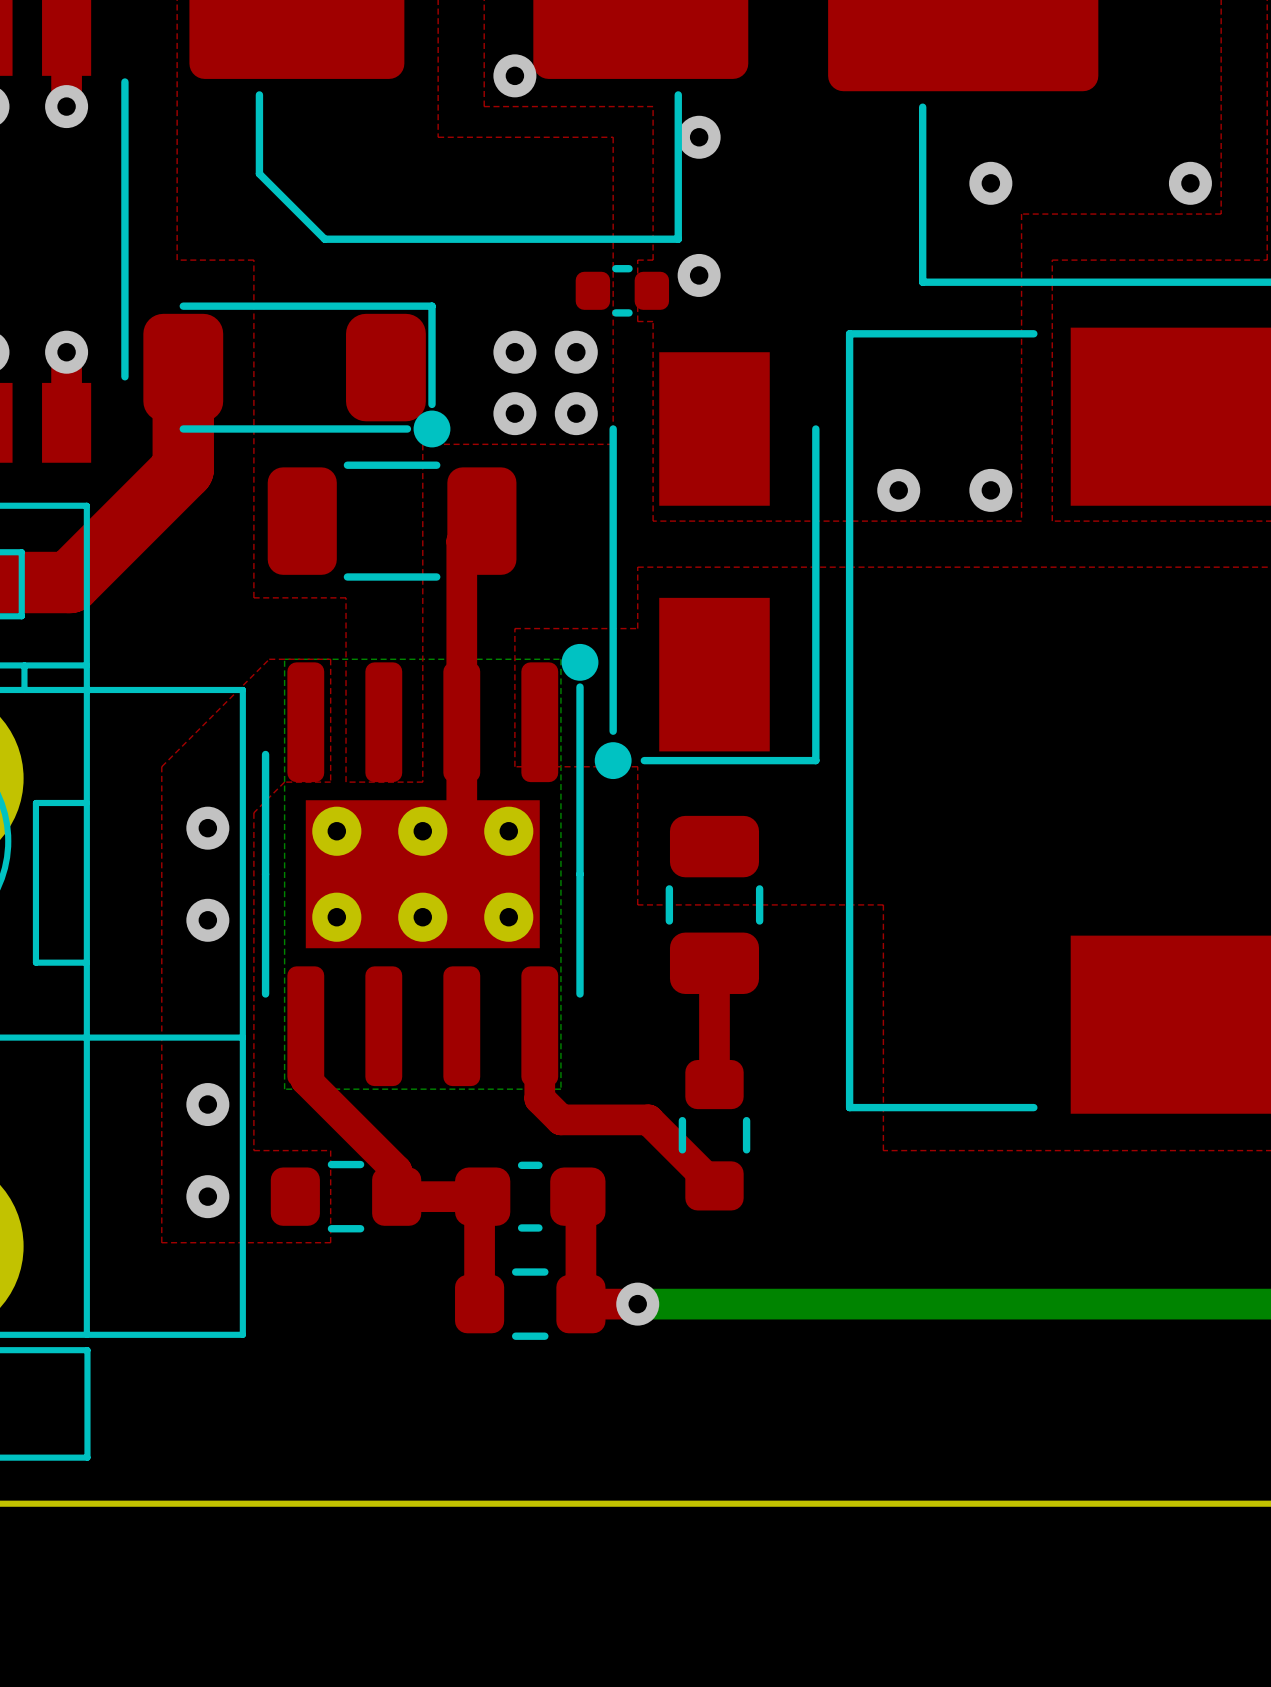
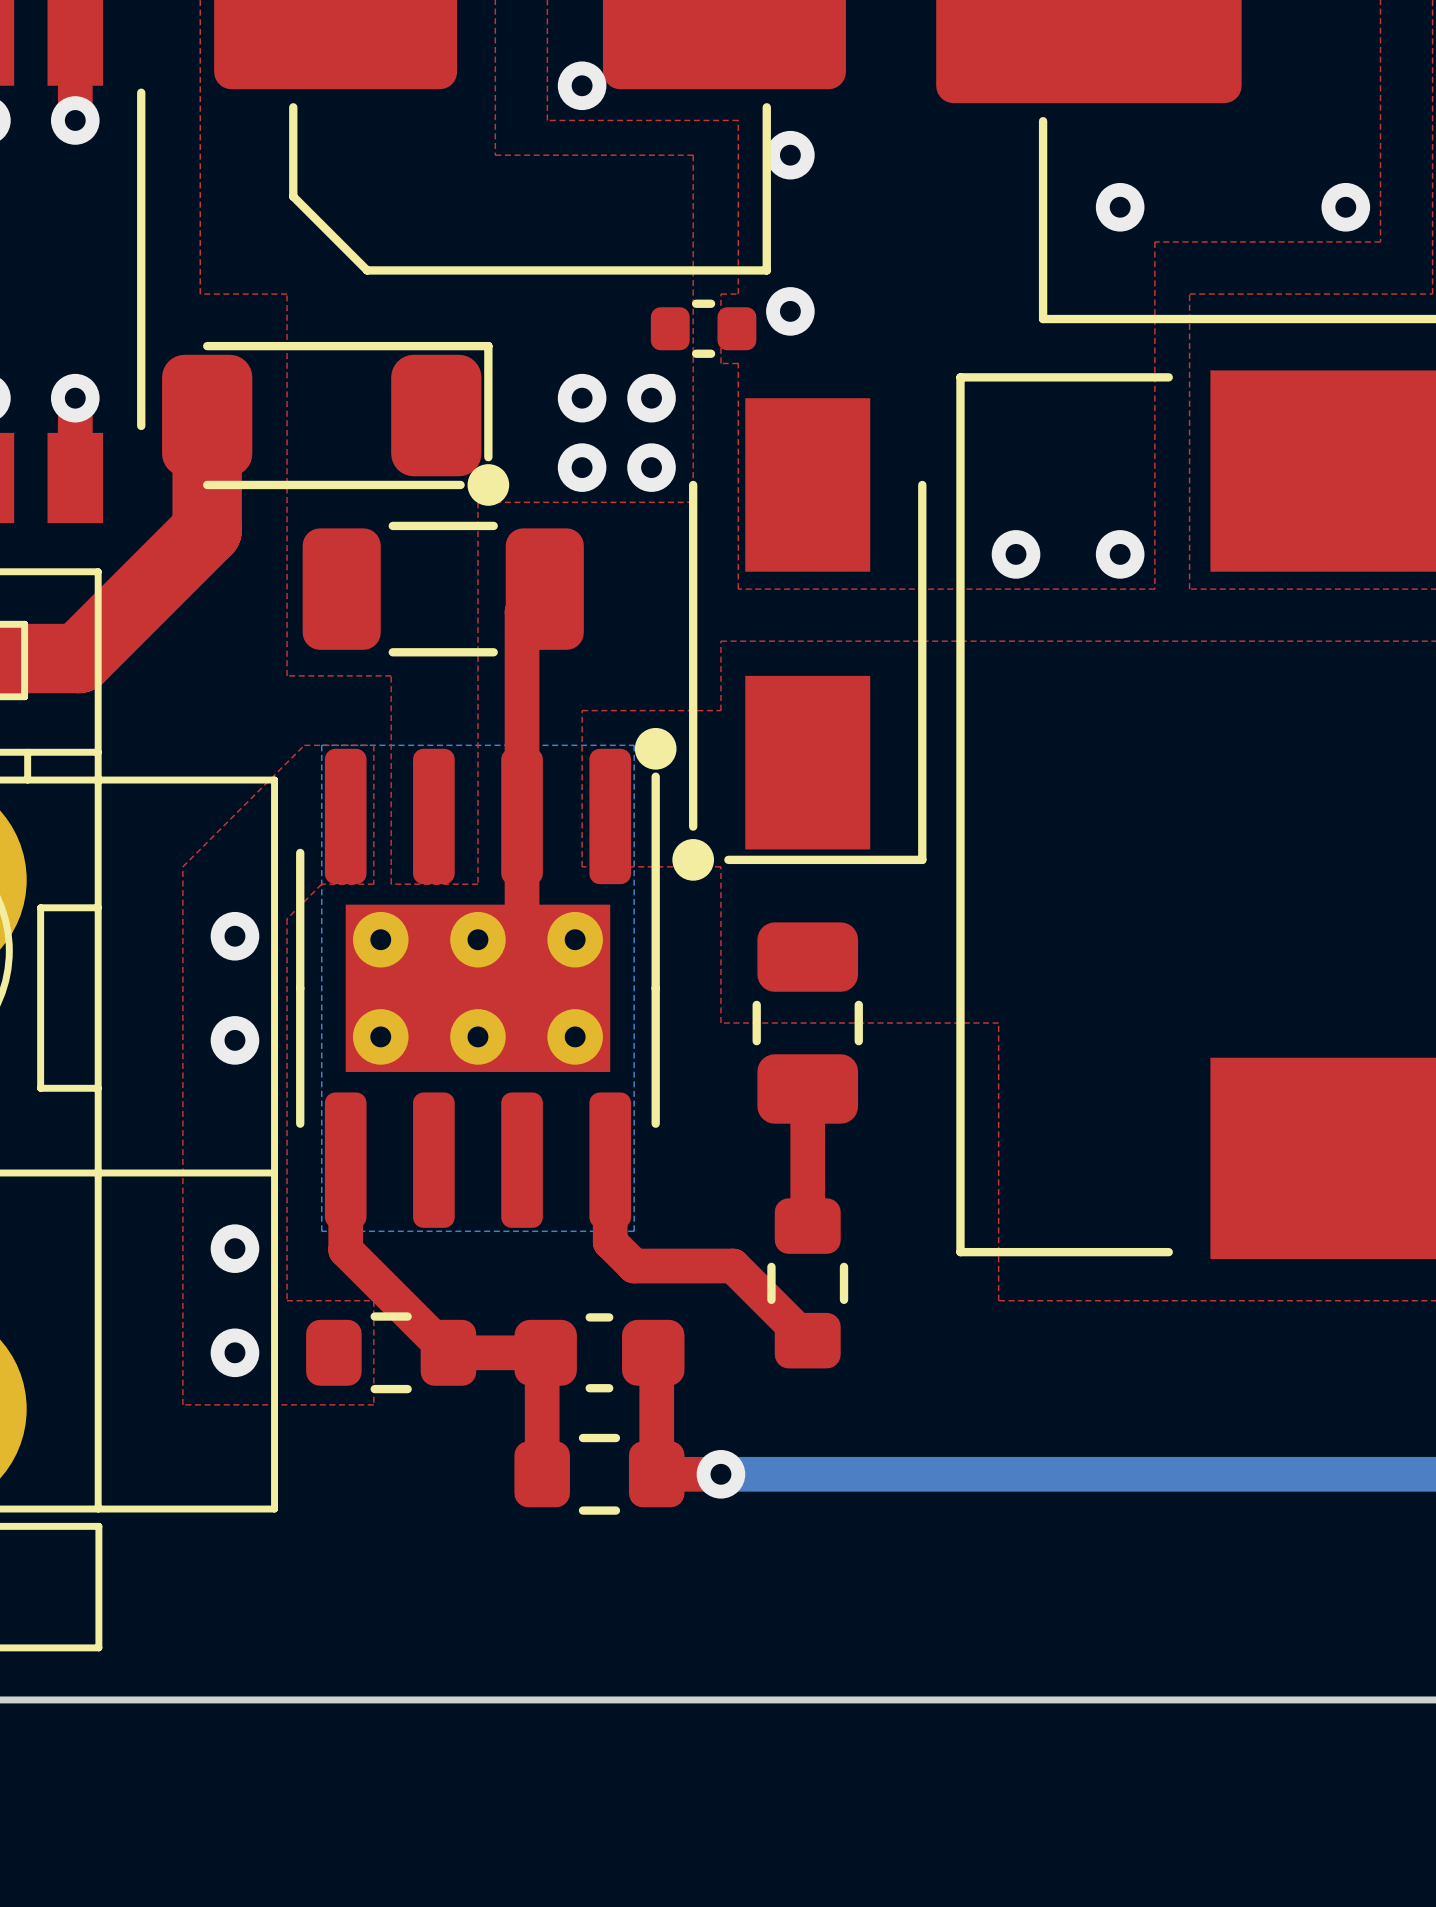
top track: (305, 1079) (396, 1170) (396, 1196) -> (345, 1220) (345, 1250) (448, 1352)

